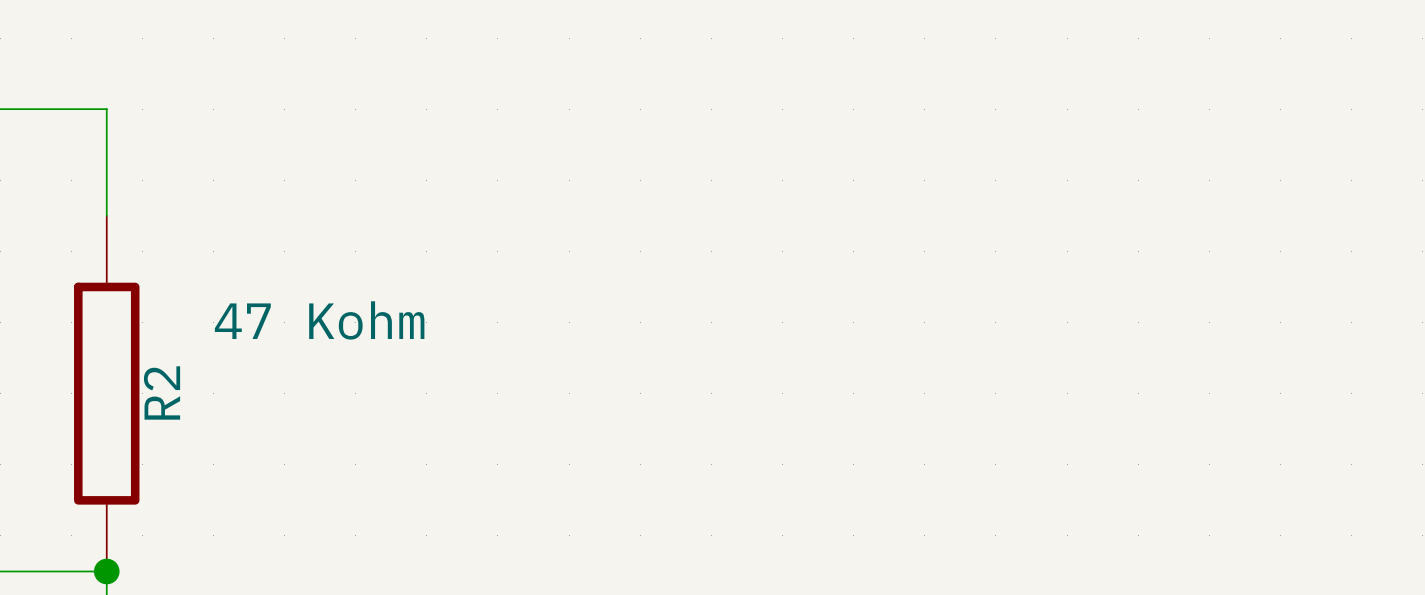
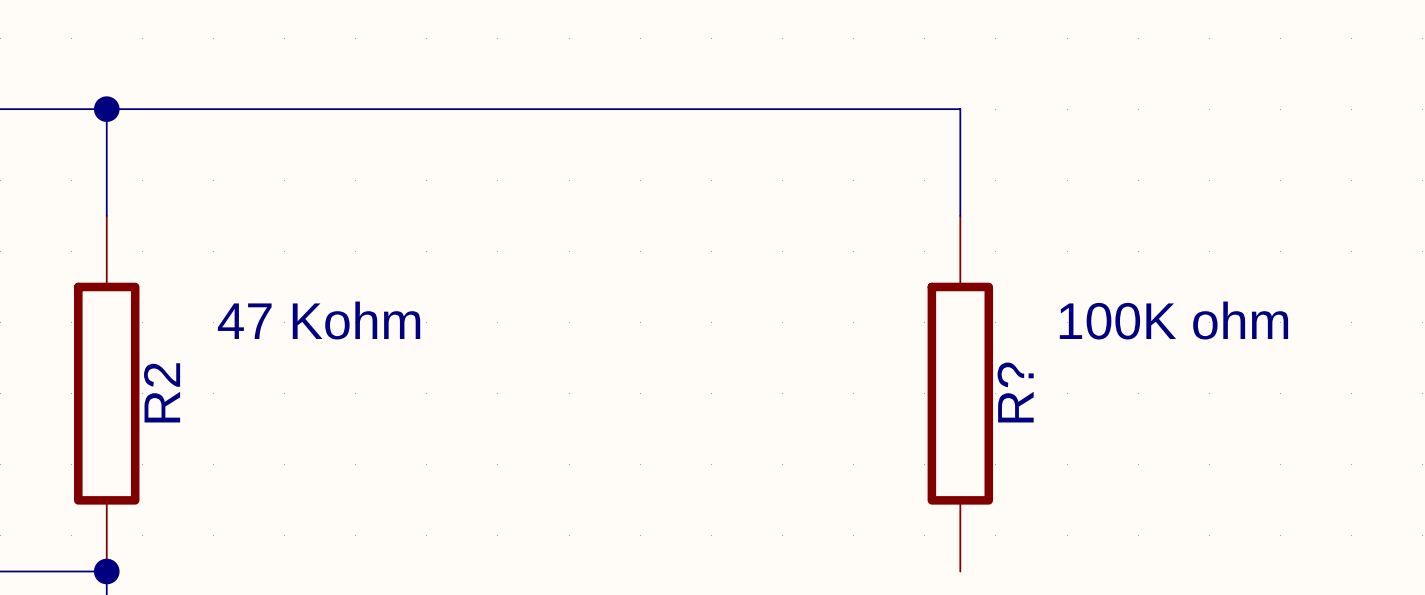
wire: none -> (106, 109) (960, 109) (960, 215)
junction: none -> (106, 109)
R?: none -> 100K ohm (960, 393)

